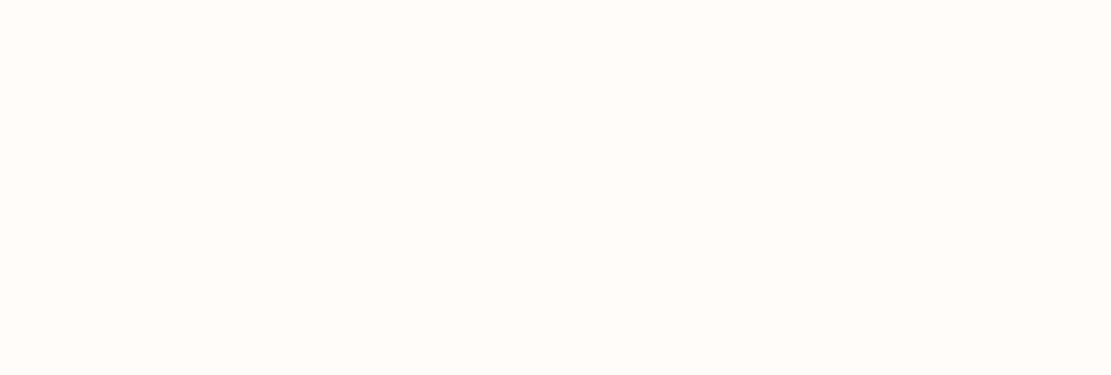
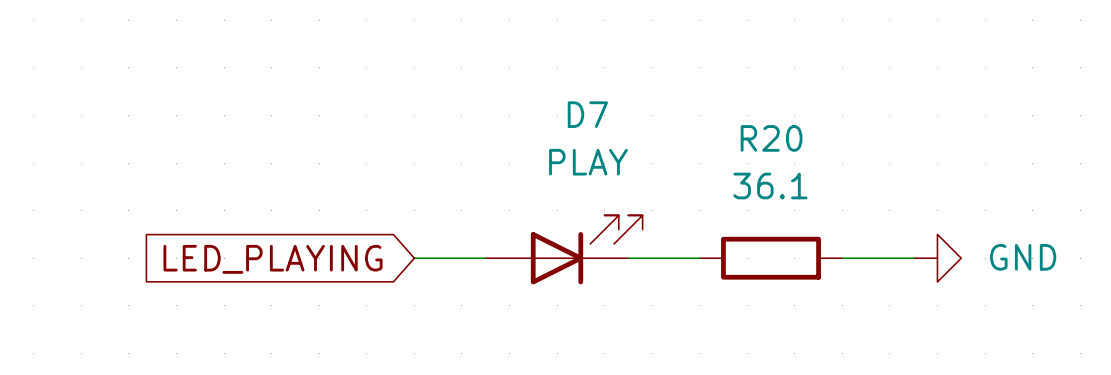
D7: none -> PLAY (564, 249)
wire: none -> (414, 258) (485, 258)
wire: none -> (628, 258) (699, 258)
R20: none -> 36.1 (771, 258)
wire: none -> (842, 258) (913, 258)
power symbol: none -> GND (937, 258)
global label: none -> LED_PLAYING (273, 259)

